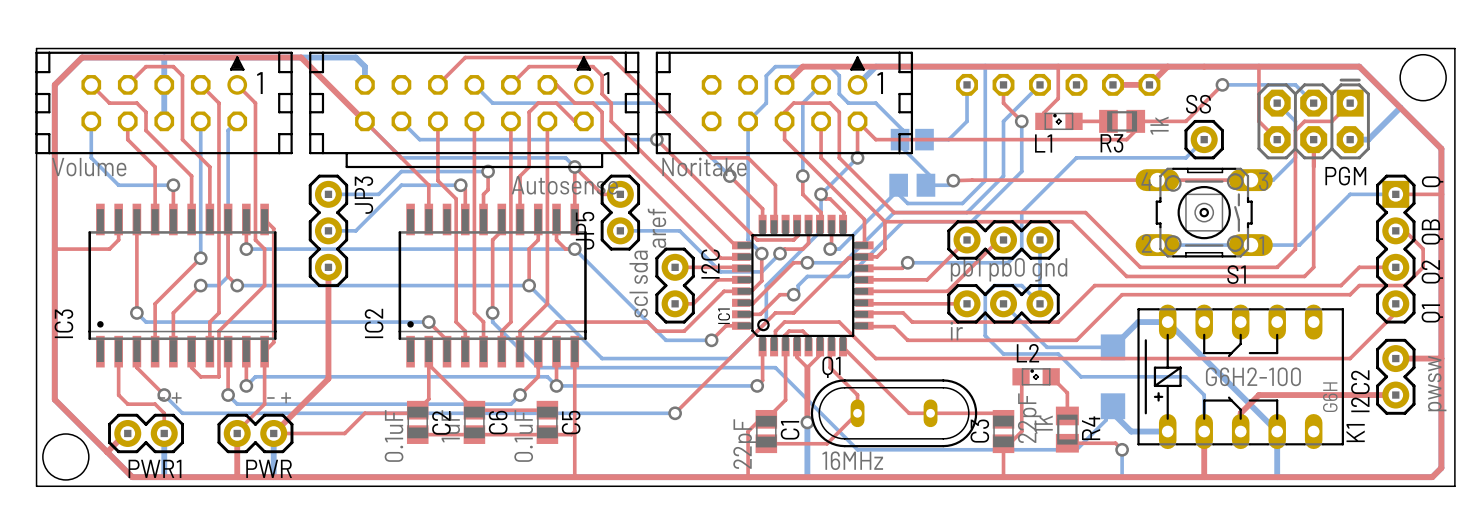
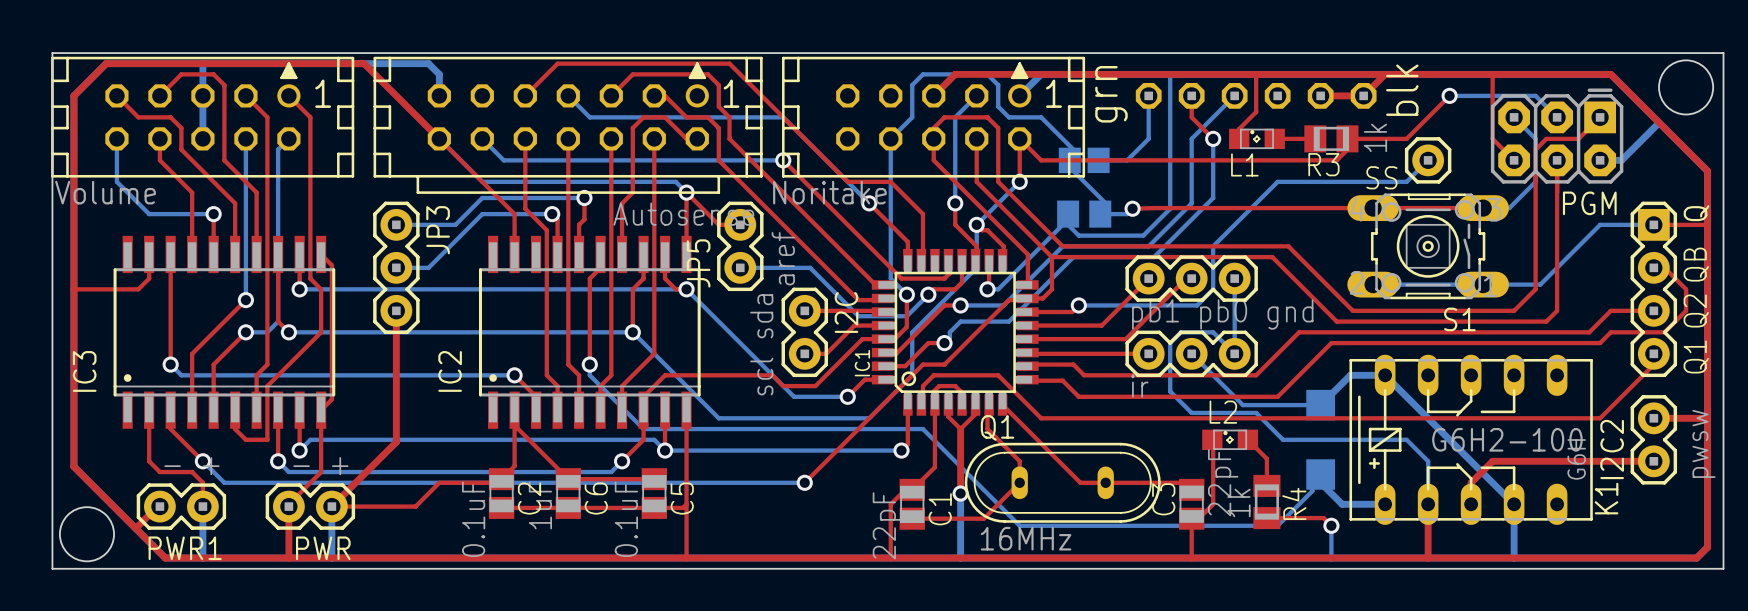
text: none -> blk (1402, 90)
text: none -> grn (1111, 94)
SS name position: SS (1198, 104) -> SS (1381, 177)

